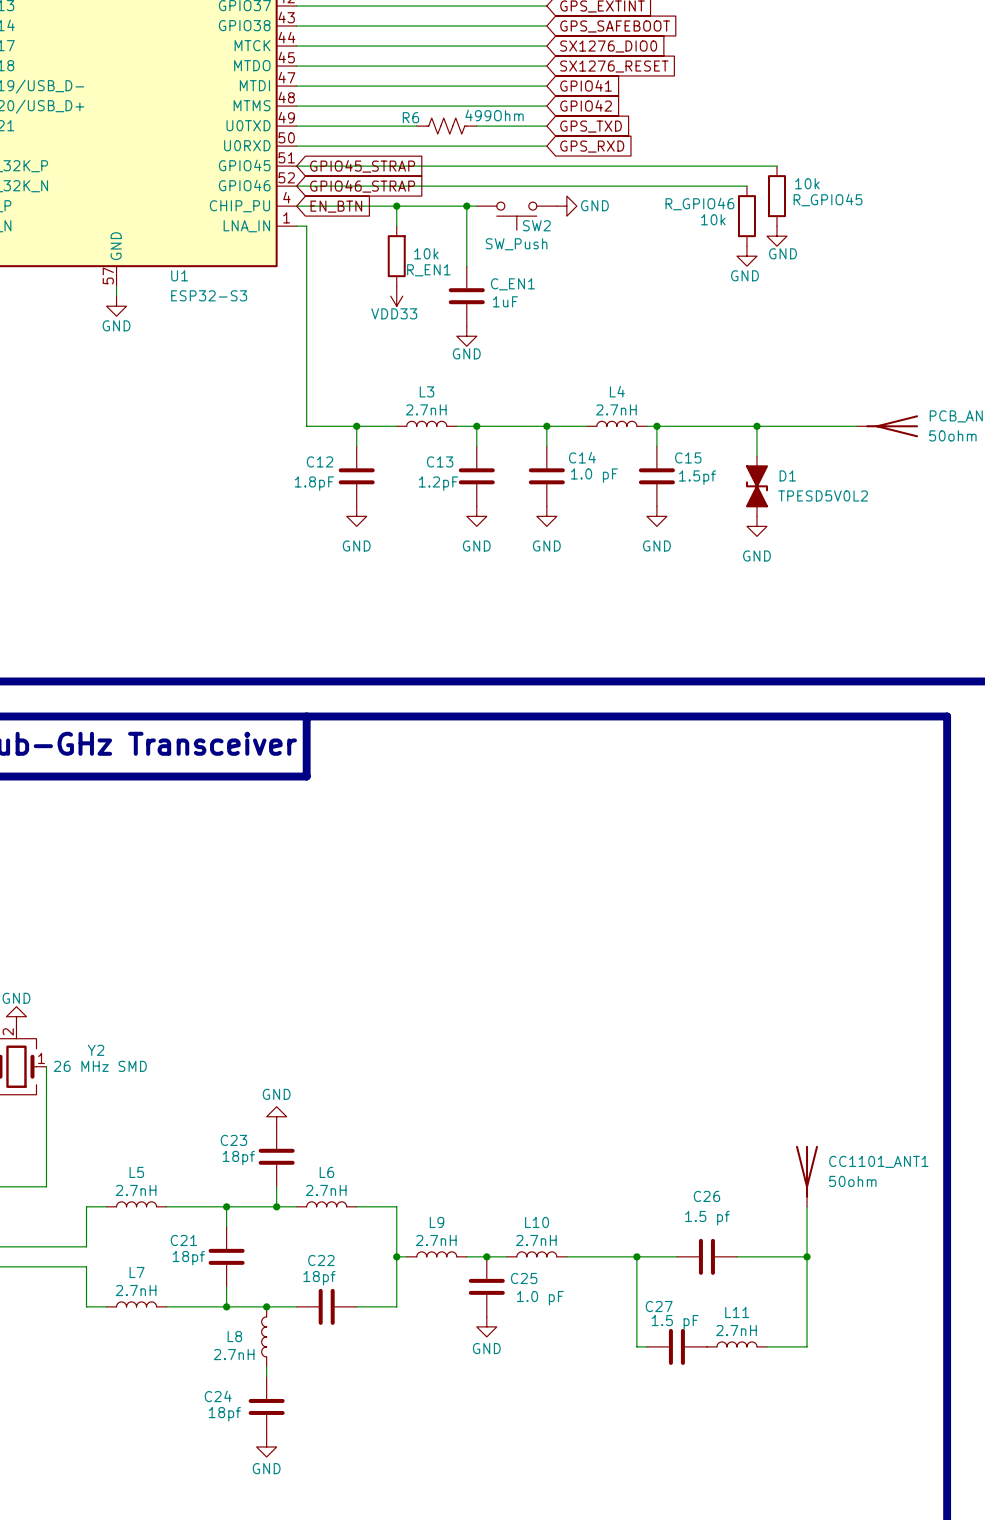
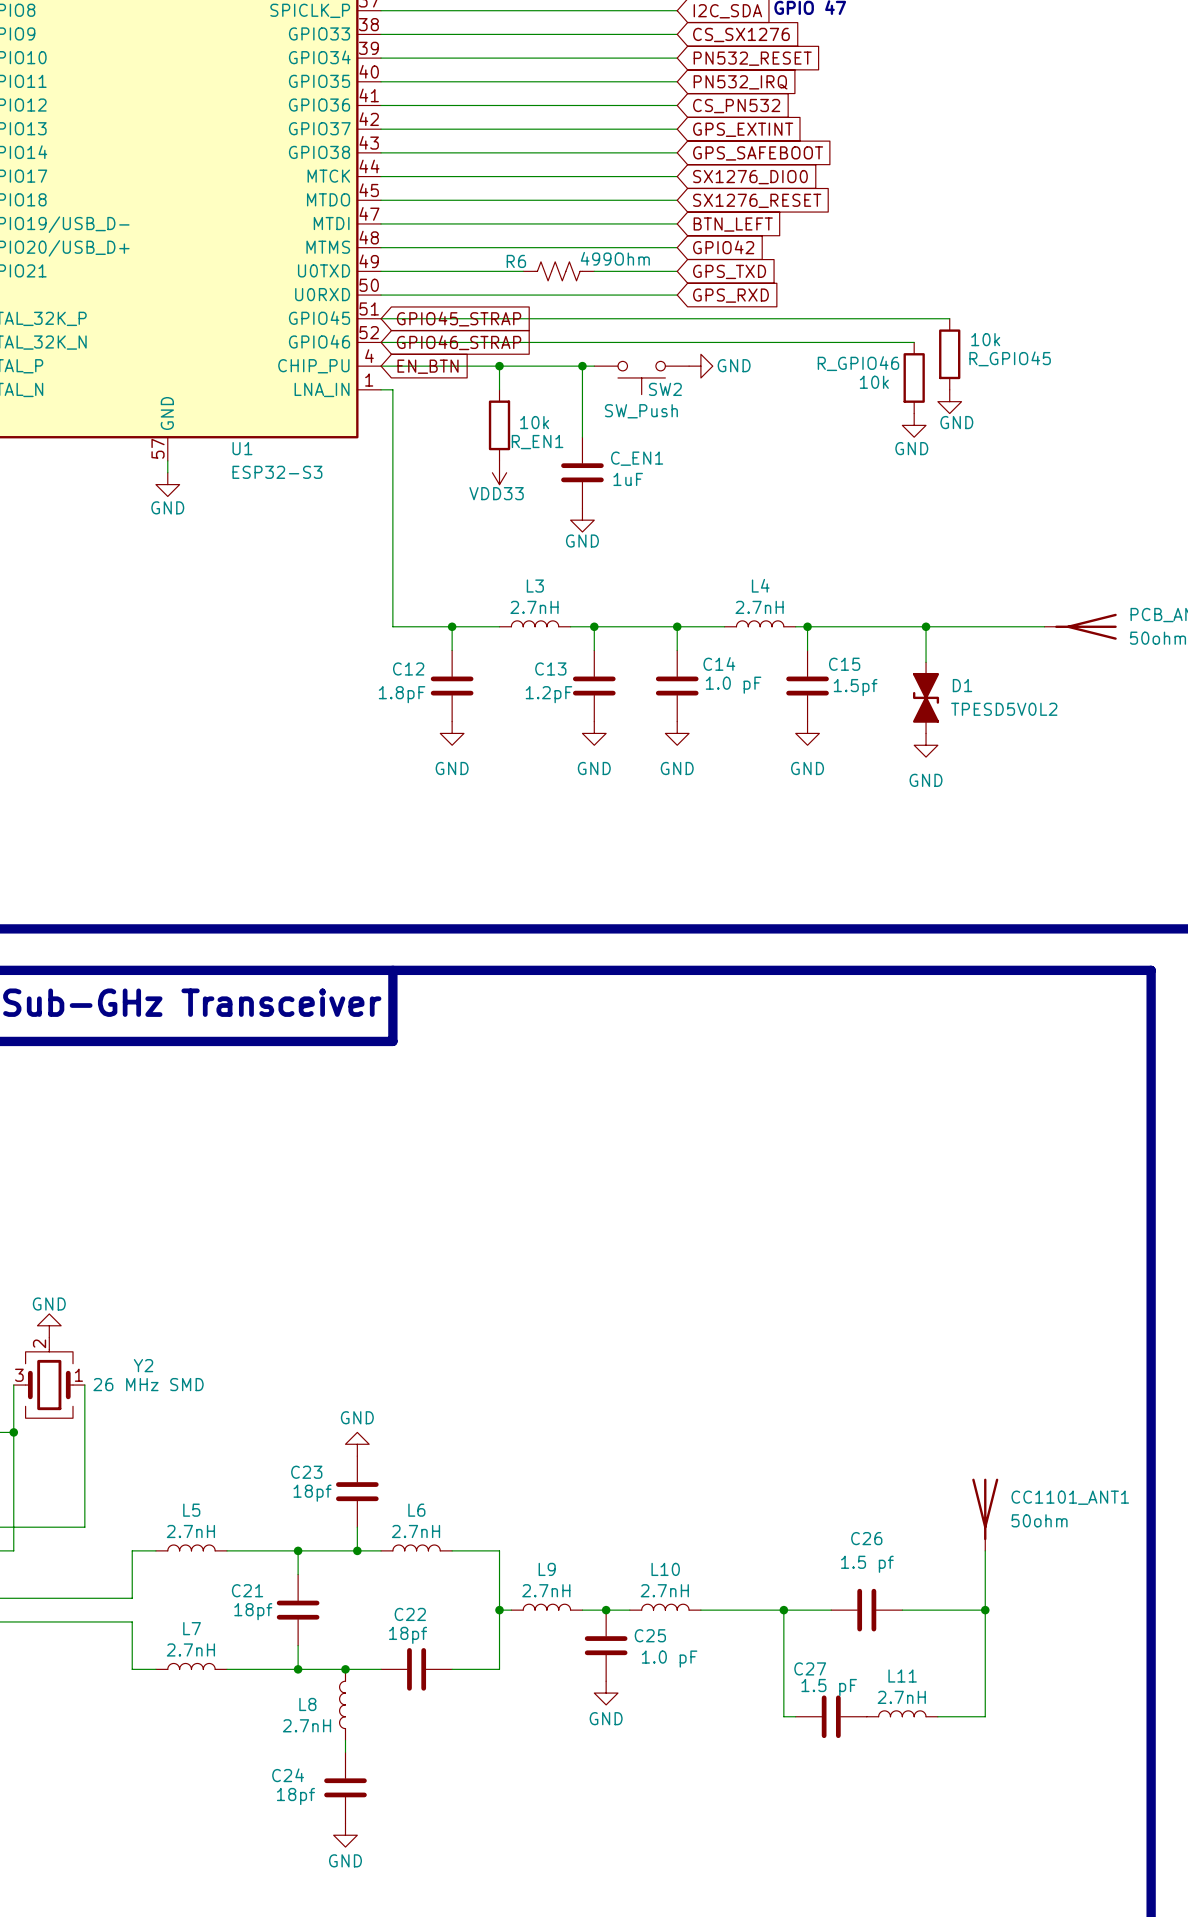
global label: GPIO41 (586, 85) -> BTN_LEFT (733, 224)

